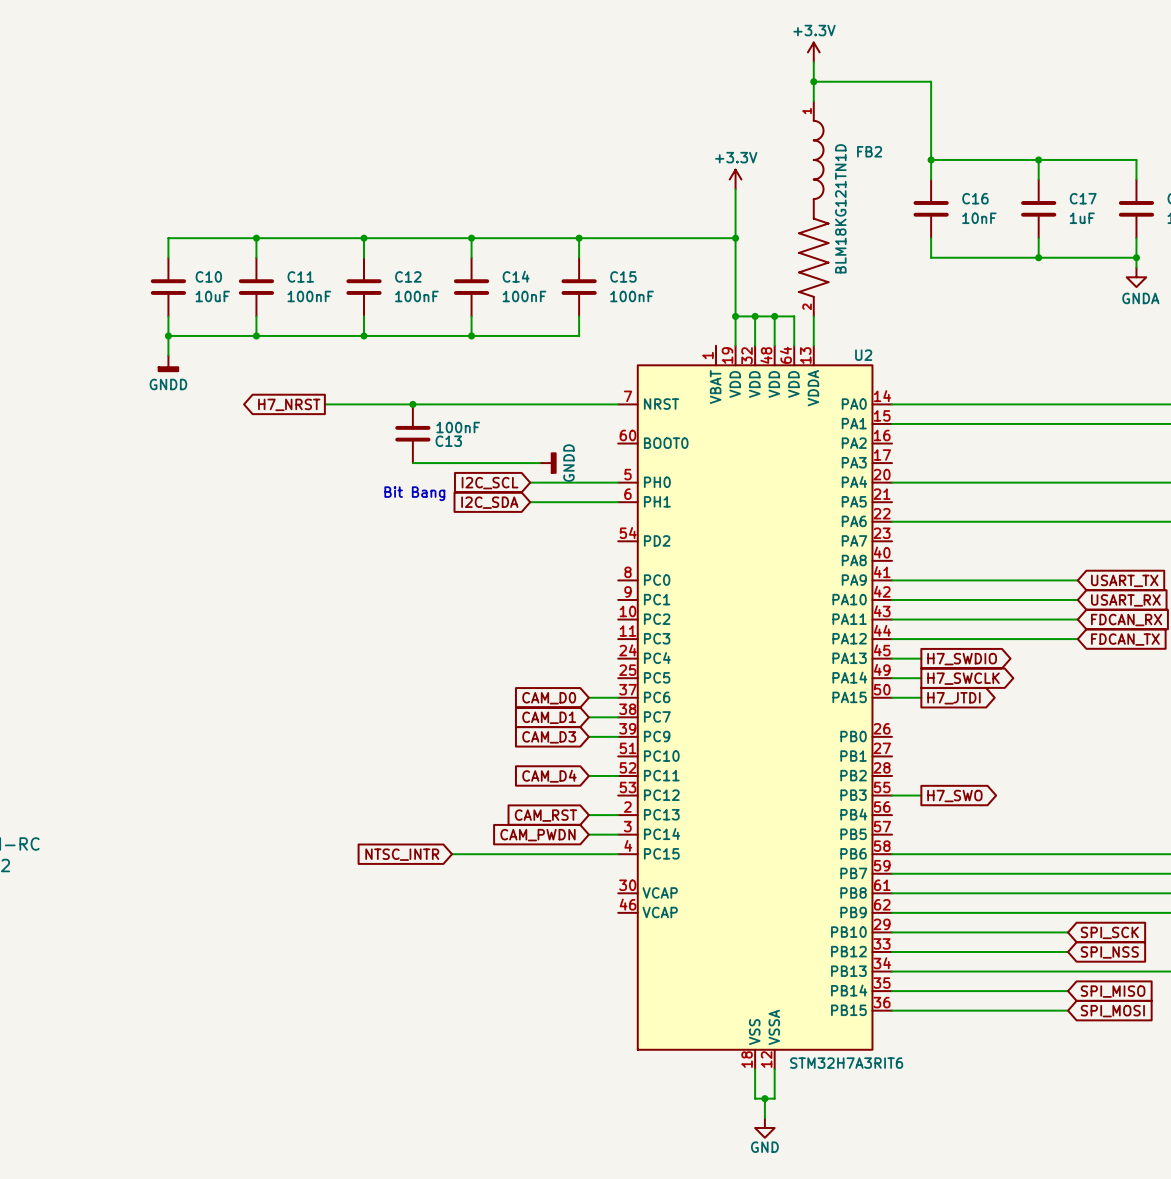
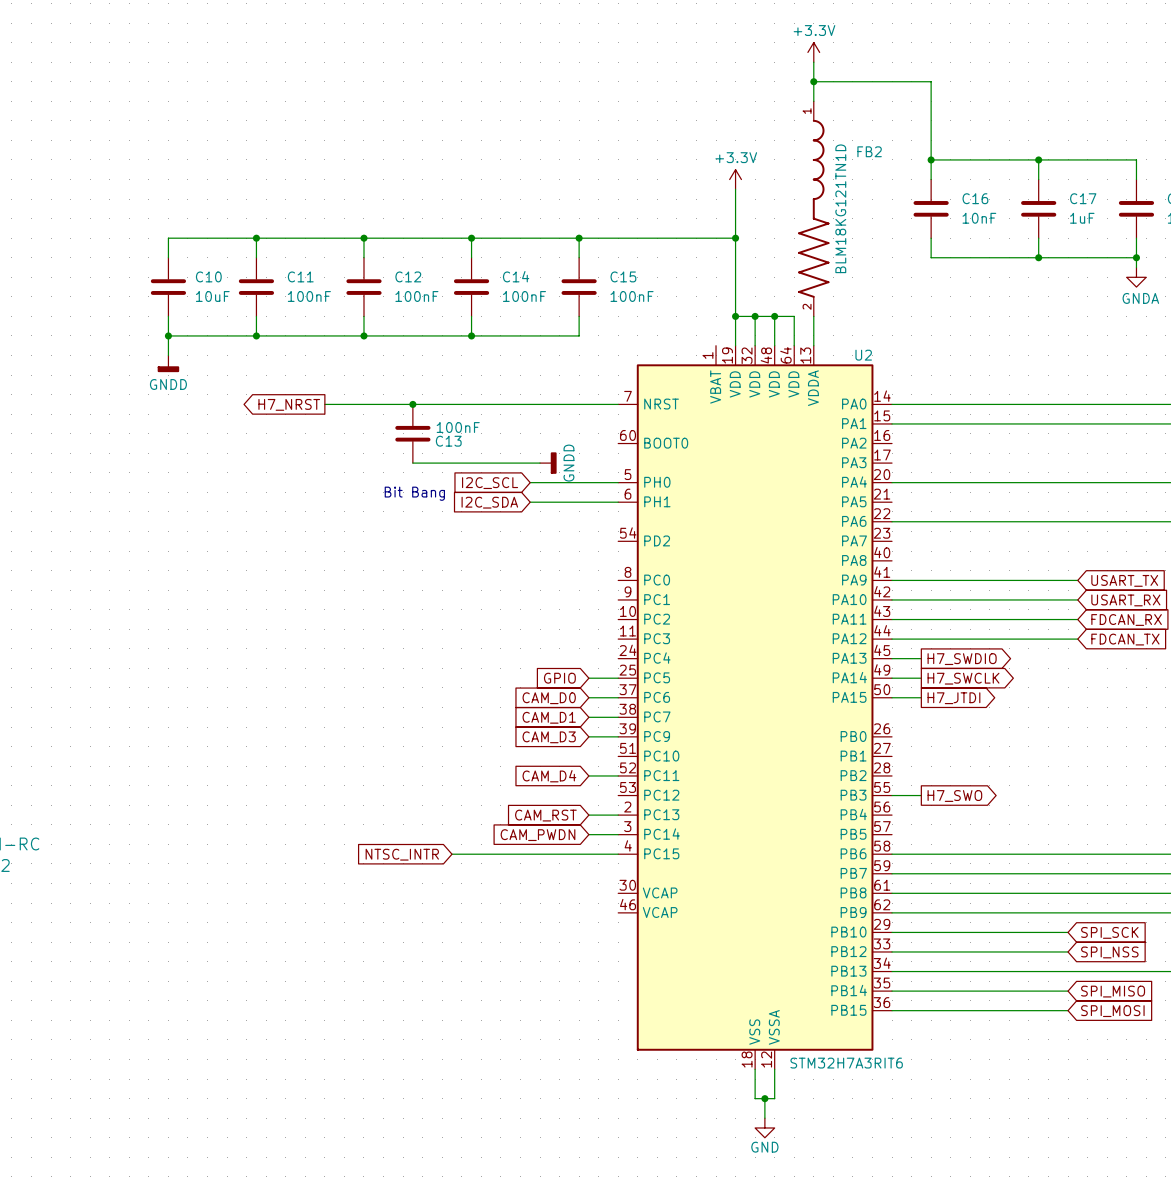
global label: none -> GPIO (559, 678)
wire: none -> (588, 678) (618, 678)

